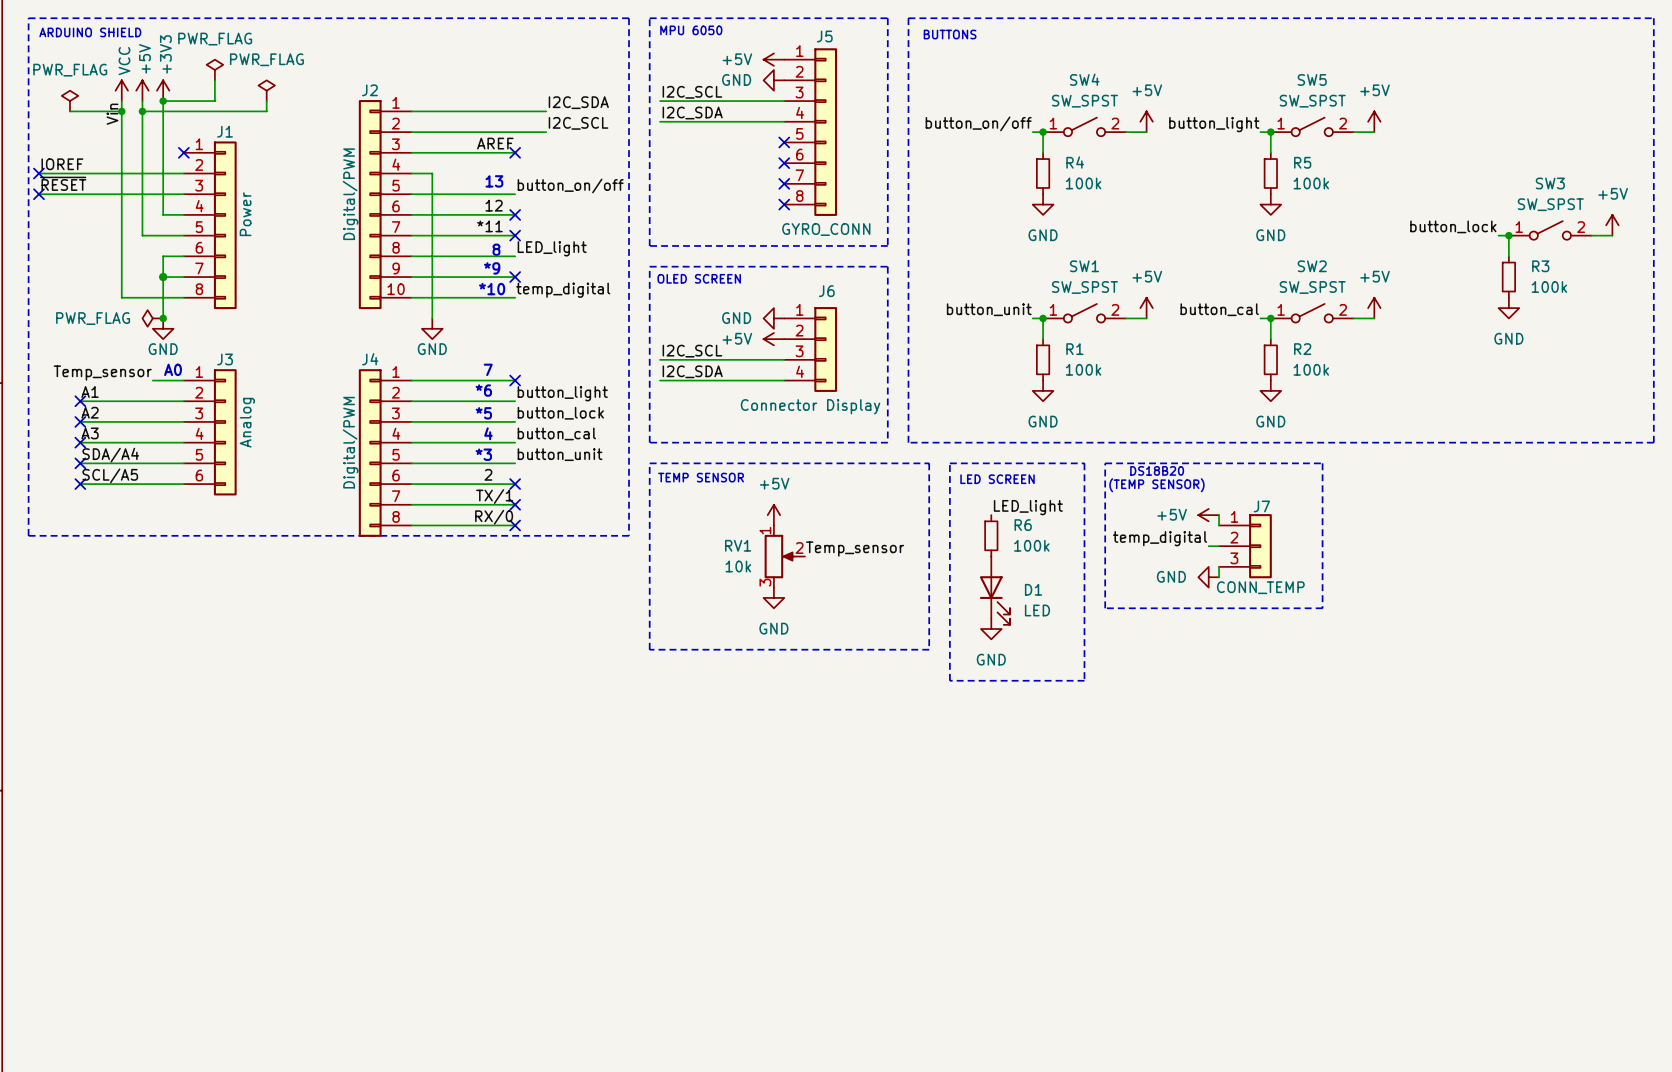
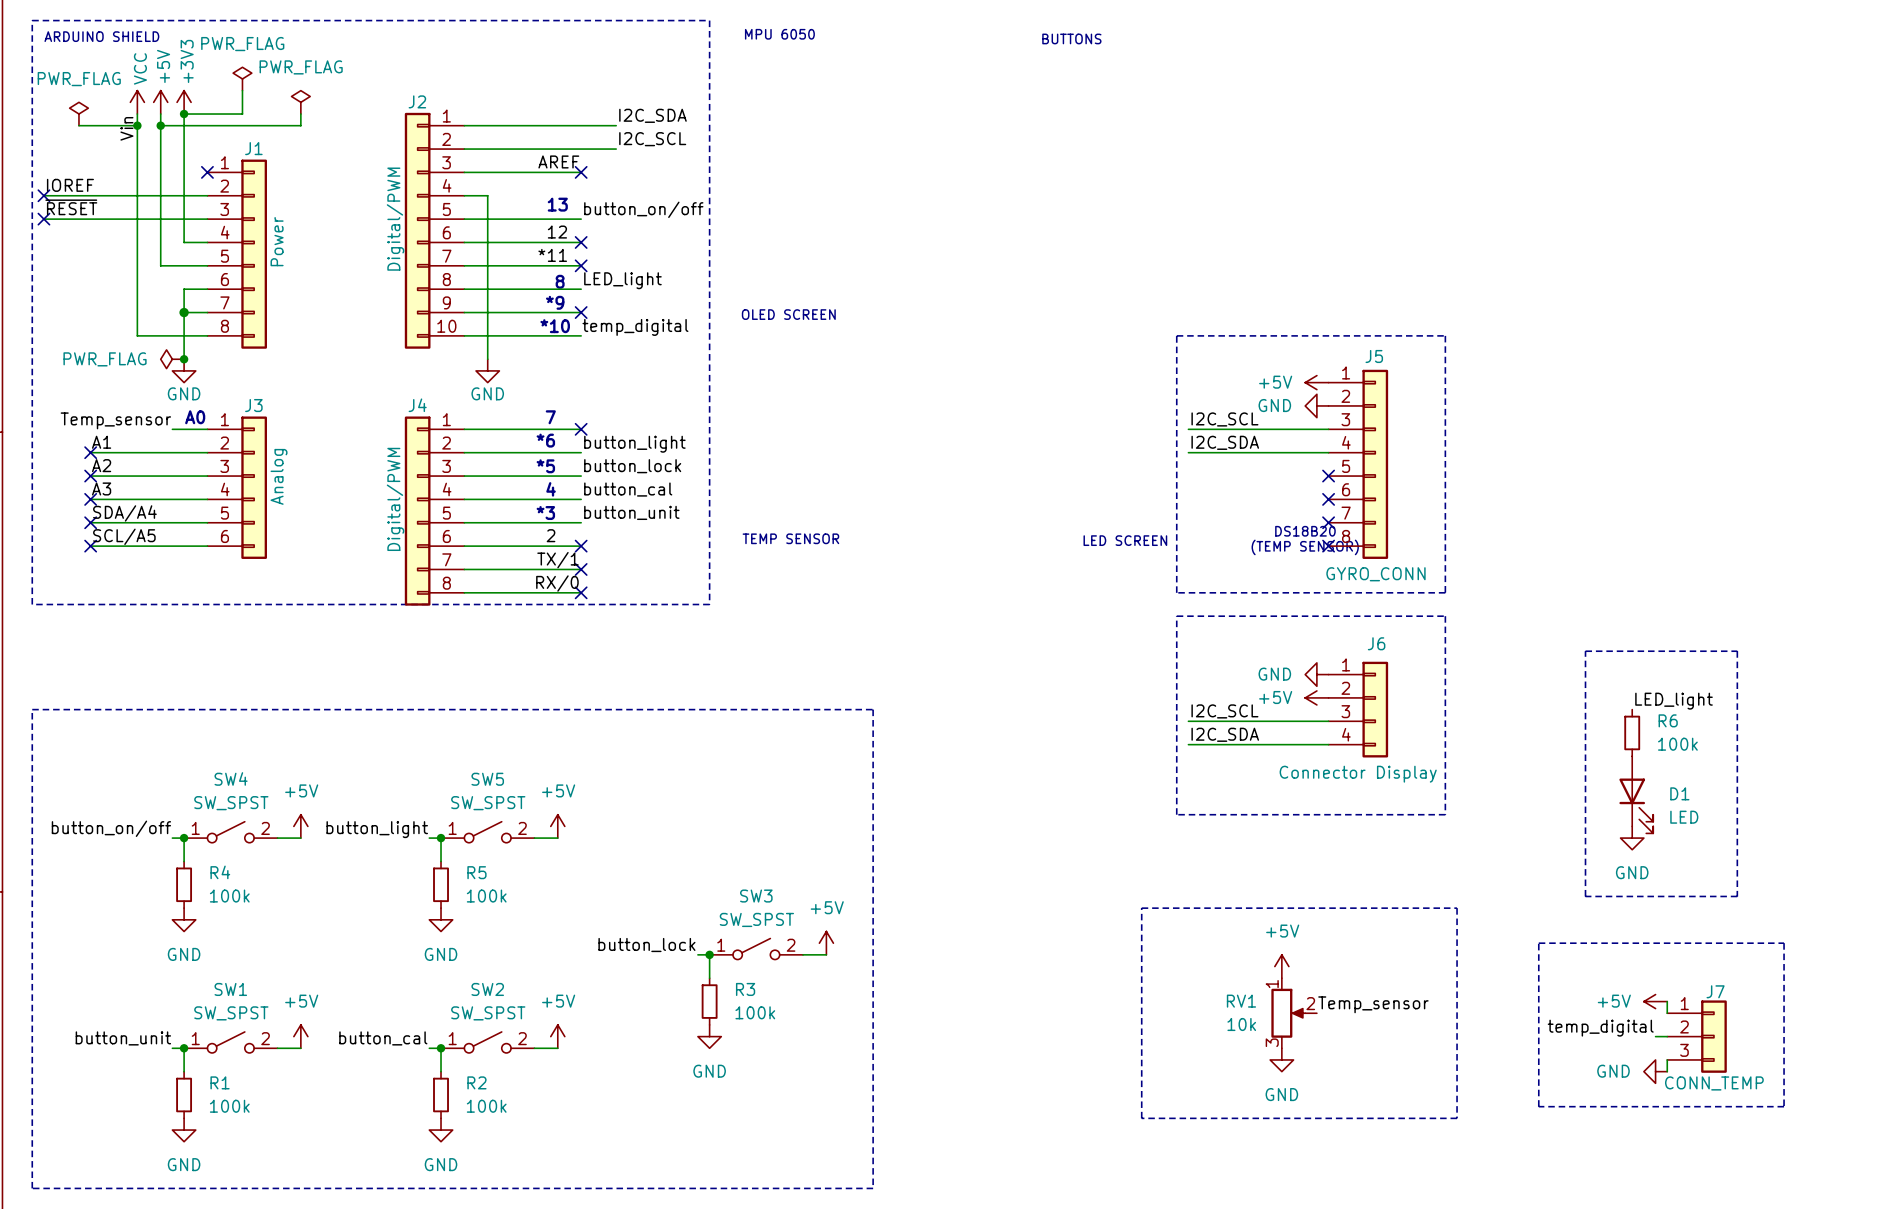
line: (649, 18) (887, 18) (887, 245) (649, 245) (649, 18) -> none
line: (908, 18) (1653, 18) (1653, 442) (908, 442) (908, 18) -> none
power symbol: +5V (773, 59) -> none
power symbol: GND (773, 80) -> none
label: I2C_SCL (692, 92) -> none
wire: (660, 101) (784, 101) -> none
label: I2C_SDA (692, 113) -> none
wire: (660, 121) (784, 121) -> none
power symbol: +5V (1146, 121) -> none
power symbol: +5V (1374, 121) -> none
label: button_on/off (978, 123) -> none
label: button_light (1214, 124) -> none
SW4 position: (1084, 126) -> (230, 832)
SW5 position: (1312, 126) -> (487, 832)
J5 position: (810, 132) -> (1358, 464)
wire: (1032, 132) (1043, 132) (1043, 152) -> none
junction: (1043, 132) -> none
wire: (1125, 132) (1146, 132) -> none
wire: (1260, 132) (1270, 132) (1270, 152) -> none
junction: (1270, 132) -> none
wire: (1353, 132) (1374, 132) -> none
no-connect mark: (784, 142) -> none
no-connect mark: (784, 163) -> none
R4 position: (1043, 173) -> (184, 884)
R5 position: (1270, 173) -> (441, 884)
no-connect mark: (784, 183) -> none
no-connect mark: (784, 204) -> none
power symbol: GND (1043, 204) -> none
power symbol: GND (1270, 204) -> none
power symbol: +5V (1612, 225) -> none
label: button_lock (1453, 226) -> none
SW3 position: (1550, 230) -> (756, 949)
wire: (1498, 235) (1508, 235) (1508, 256) -> none
junction: (1508, 235) -> none
wire: (1591, 235) (1612, 235) -> none
line: (649, 266) (649, 442) (887, 442) (887, 266) (649, 266) -> none
R3 position: (1508, 277) -> (709, 1001)
line: none -> (1176, 335) (1445, 335) (1445, 592) (1176, 592) (1176, 335)
power symbol rotation: 0° (1146, 308) -> 90° counterclockwise (1316, 382)
power symbol position: +5V (1146, 308) -> +5V (1316, 382)
power symbol: +5V (1374, 308) -> none
power symbol: GND (1508, 308) -> none
label: button_unit (989, 309) -> none
label: button_cal (1219, 309) -> none
SW1 position: (1084, 313) -> (230, 1042)
SW2 position: (1312, 313) -> (487, 1042)
power symbol: GND (773, 318) -> none
wire: (1032, 318) (1043, 318) (1043, 339) -> none
junction: (1043, 318) -> none
wire: (1125, 318) (1146, 318) -> none
wire: (1260, 318) (1270, 318) (1270, 339) -> none
junction: (1270, 318) -> none
wire: (1353, 318) (1374, 318) -> none
power symbol: +5V (773, 339) -> none
J6 position: (810, 349) -> (1358, 709)
label: I2C_SCL (692, 351) -> none
wire: (660, 359) (784, 359) -> none
R1 position: (1043, 359) -> (184, 1095)
power symbol: none -> GND (1316, 405)
R2 position: (1270, 359) -> (441, 1095)
label: I2C_SDA (692, 371) -> none
label: none -> I2C_SCL (1224, 419)
wire: (660, 380) (784, 380) -> none
wire: none -> (1188, 429) (1328, 429)
power symbol: GND (1043, 390) -> none
power symbol: GND (1270, 390) -> none
label: none -> I2C_SDA (1225, 442)
wire: none -> (1188, 452) (1328, 452)
no-connect mark: none -> (1328, 476)
no-connect mark: none -> (1328, 499)
line: (649, 463) (929, 463) (929, 649) (649, 649) (649, 463) -> none
line: (949, 463) (1084, 463) (1084, 680) (949, 680) (949, 463) -> none
line: (1105, 463) (1322, 463) (1322, 608) (1105, 608) (1105, 463) -> none
no-connect mark: none -> (1328, 522)
no-connect mark: none -> (1328, 546)
label: LED_light (1028, 507) -> none
power symbol: +5V (773, 515) -> none
power symbol: +5V (1208, 515) -> none
wire: (1219, 515) (1219, 525) -> none
R6 position: (991, 535) -> (1632, 732)
label: temp_digital (1160, 538) -> none
line: none -> (1176, 616) (1176, 814) (1445, 814) (1445, 616) (1176, 616)
J7 position: (1245, 546) -> (1697, 1036)
label: Temp_sensor (855, 549) -> none
RV1 position: (784, 556) -> (1294, 1013)
wire: (1219, 566) (1219, 577) -> none
power symbol position: GND (1208, 577) -> GND (1316, 674)
line: none -> (1585, 651) (1737, 651) (1737, 896) (1585, 896) (1585, 651)
D1 position: (994, 590) -> (1636, 794)
power symbol: GND (773, 597) -> none
power symbol: none -> +5V (1316, 697)
label: none -> LED_light (1674, 701)
line: none -> (32, 709) (32, 1188) (873, 1188) (873, 709) (32, 709)
power symbol: GND (991, 628) -> none
label: none -> I2C_SCL (1224, 711)
wire: none -> (1188, 721) (1328, 721)
label: none -> I2C_SDA (1225, 734)
wire: none -> (1188, 744) (1328, 744)
power symbol: none -> +5V (300, 826)
power symbol: none -> +5V (557, 826)
label: none -> button_on/off (111, 828)
label: none -> button_light (377, 829)
wire: none -> (172, 838) (184, 838) (184, 861)
junction: none -> (184, 838)
wire: none -> (277, 838) (300, 838)
wire: none -> (429, 838) (441, 838) (441, 861)
junction: none -> (441, 838)
wire: none -> (534, 838) (557, 838)
power symbol: none -> GND (1632, 838)
line: none -> (1141, 908) (1457, 908) (1457, 1118) (1141, 1118) (1141, 908)
power symbol: none -> GND (184, 919)
power symbol: none -> GND (441, 919)
power symbol: none -> +5V (826, 943)
line: none -> (1538, 943) (1784, 943) (1784, 1106) (1538, 1106) (1538, 943)
label: none -> button_lock (646, 944)
wire: none -> (697, 954) (709, 954) (709, 978)
junction: none -> (709, 954)
wire: none -> (803, 954) (826, 954)
power symbol: none -> +5V (1281, 966)
power symbol: none -> +5V (1655, 1001)
wire: none -> (1667, 1001) (1667, 1013)
label: none -> Temp_sensor (1373, 1004)
label: none -> temp_digital (1600, 1028)
power symbol: none -> +5V (300, 1036)
power symbol: none -> +5V (557, 1036)
power symbol: none -> GND (709, 1036)
wire: none -> (1655, 1036) (1667, 1036)
label: none -> button_unit (123, 1038)
label: none -> button_cal (383, 1038)
wire: none -> (172, 1048) (184, 1048) (184, 1071)
junction: none -> (184, 1048)
wire: none -> (277, 1048) (300, 1048)
wire: none -> (429, 1048) (441, 1048) (441, 1071)
junction: none -> (441, 1048)
wire: none -> (534, 1048) (557, 1048)
power symbol: none -> GND (1281, 1059)
wire: none -> (1667, 1059) (1667, 1071)
power symbol: none -> GND (1655, 1071)
power symbol: none -> GND (184, 1130)
power symbol: none -> GND (441, 1130)

